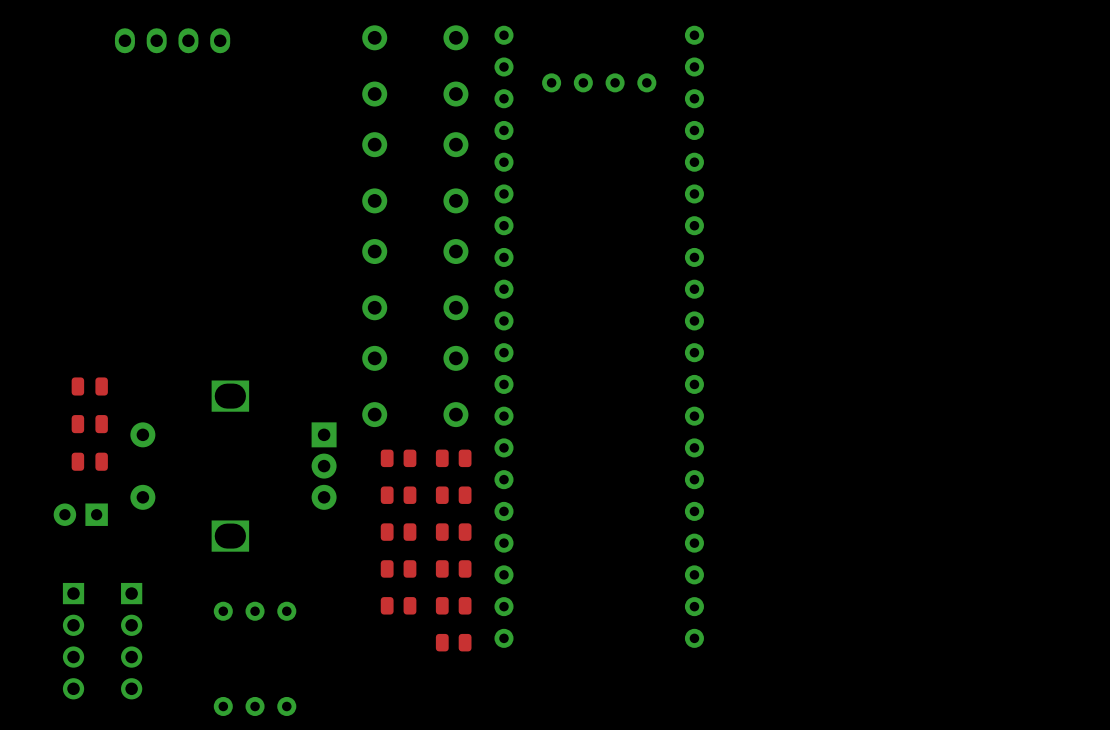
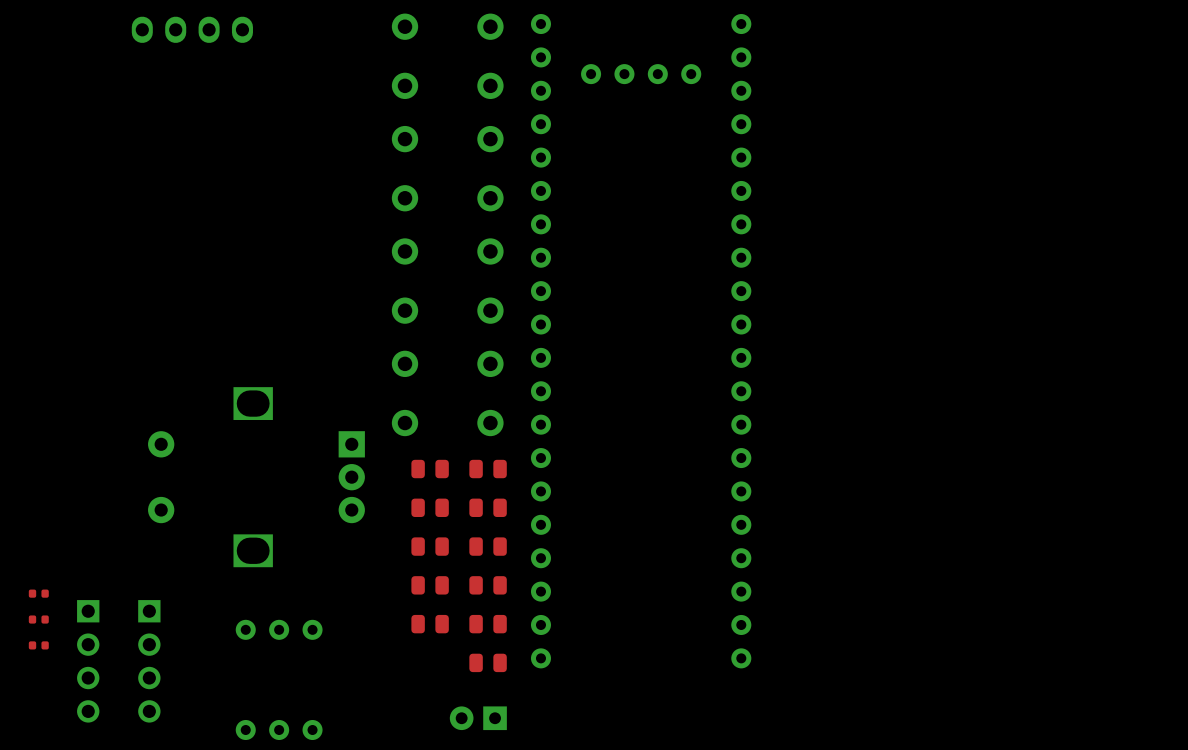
part: (89, 386) -> none
part: (89, 424) -> none
part: (89, 461) -> none
part: (80, 514) -> none
part: none -> (38, 593)
part: none -> (38, 619)
part: none -> (38, 645)
part: none -> (478, 718)

